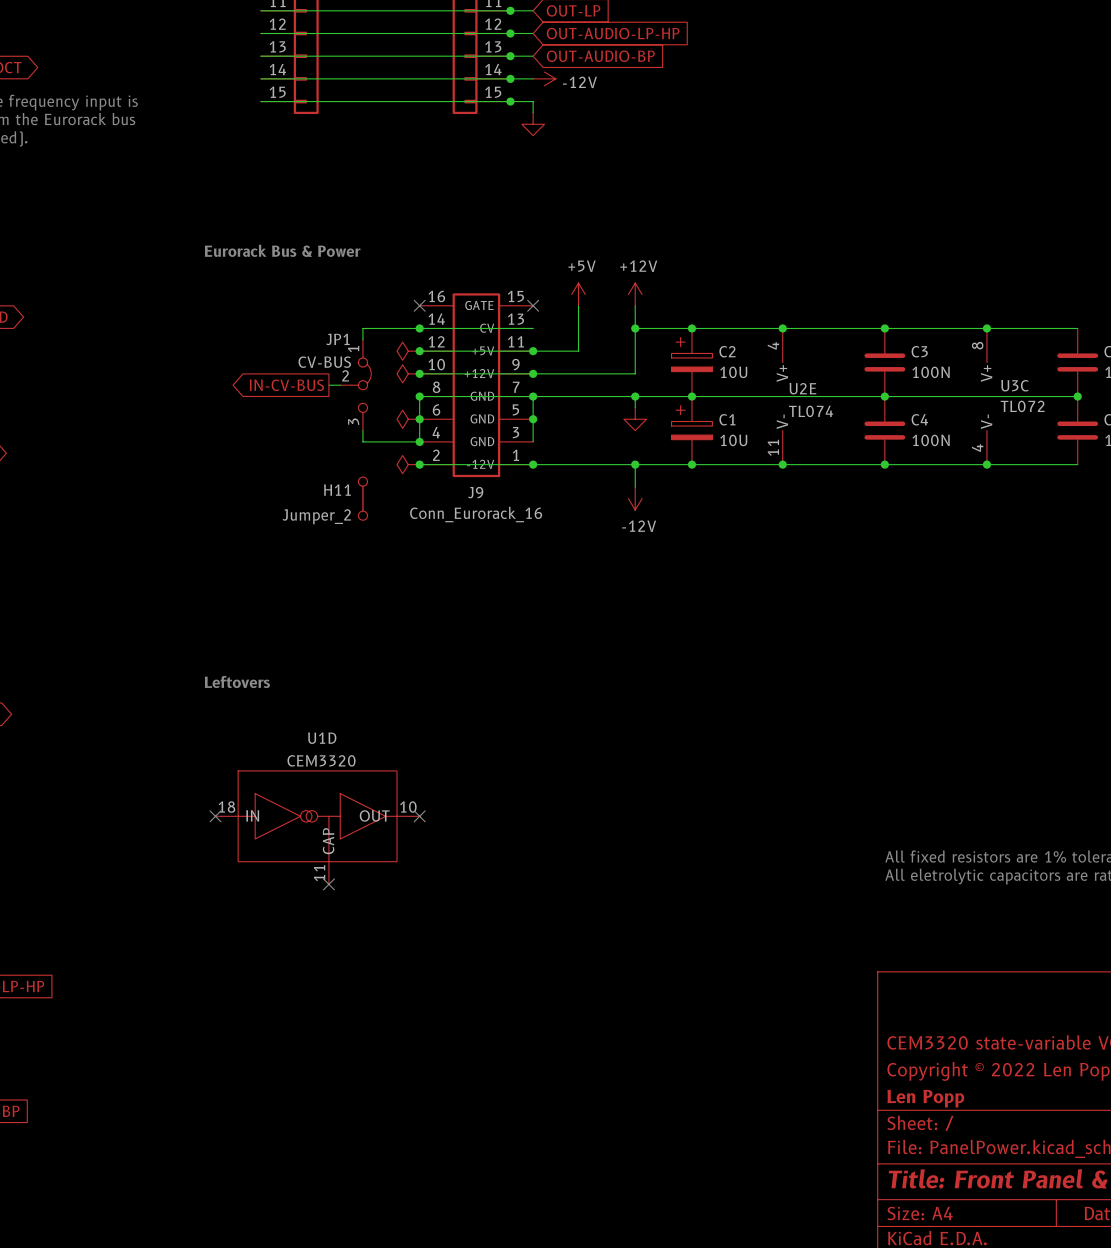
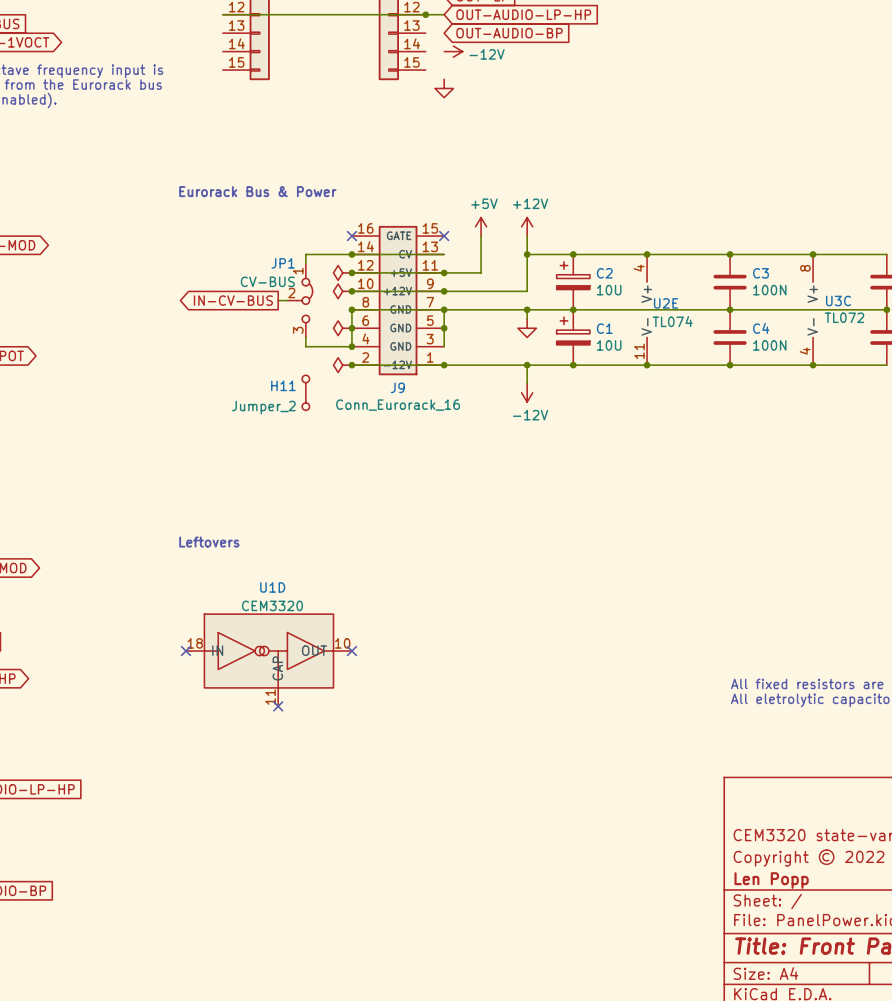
wire: (260, 56) (533, 56) -> none
junction: (510, 56) -> none
wire: (260, 78) (533, 78) -> none
junction: (510, 78) -> none
wire: (260, 101) (533, 101) (533, 112) -> none
junction: (510, 101) -> none

